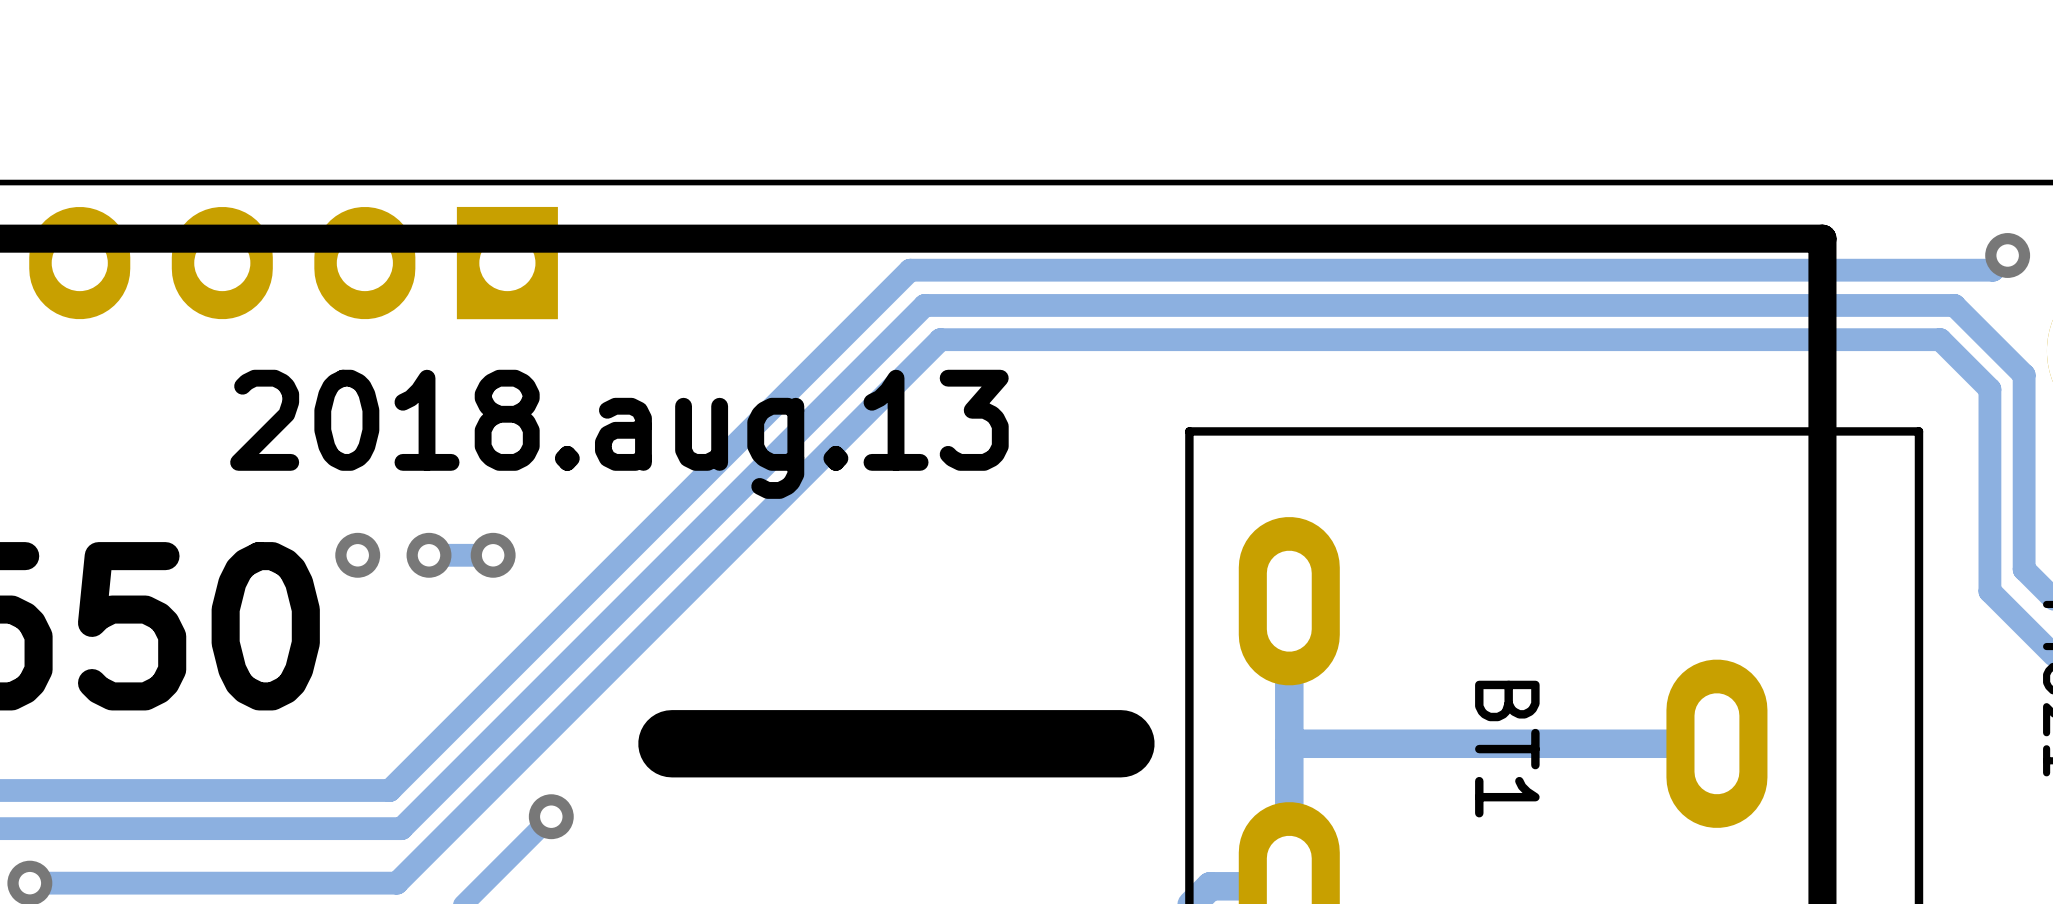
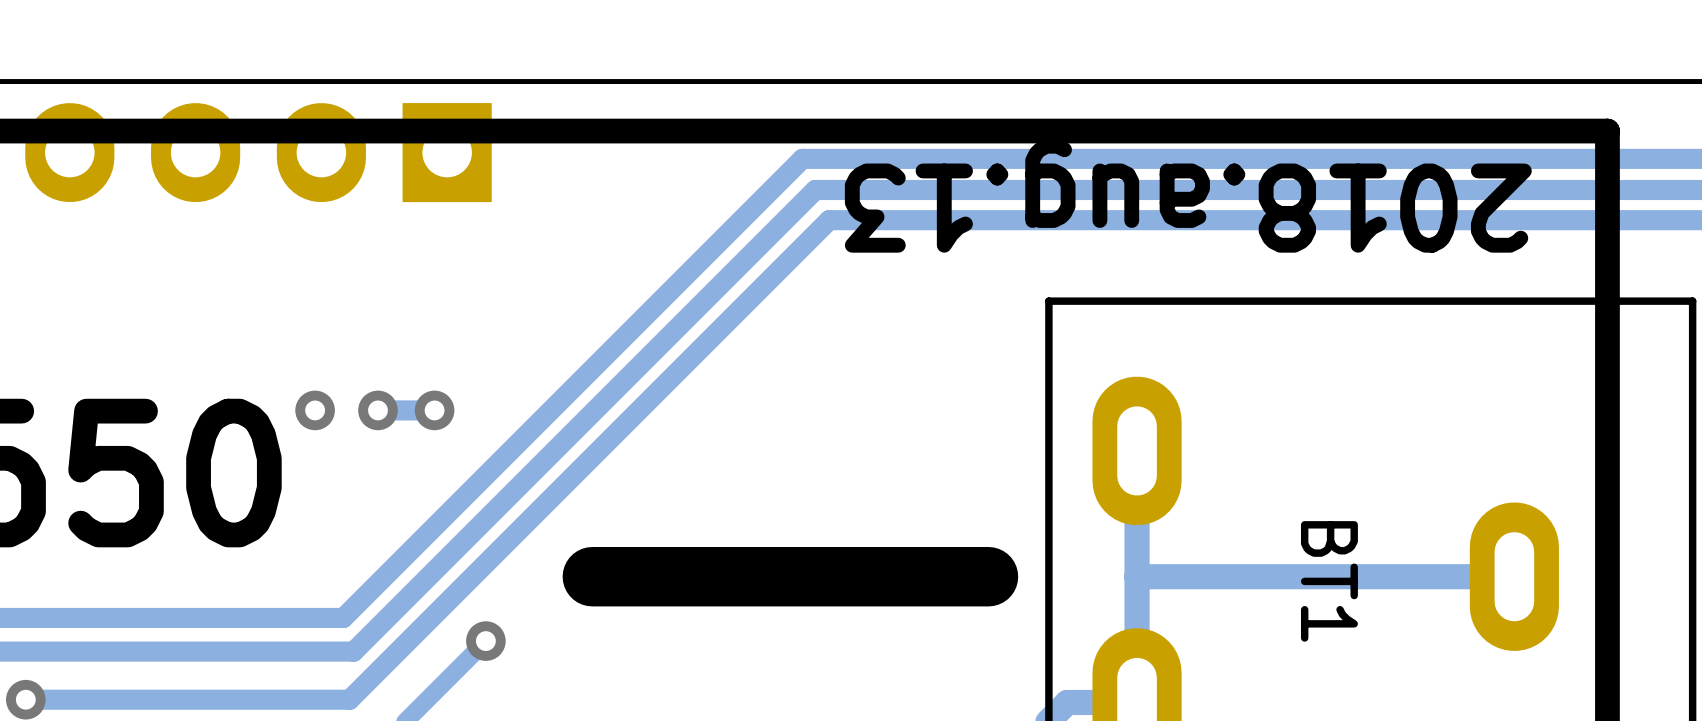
text rotation: 0° (619, 434) -> 180° (1188, 195)

